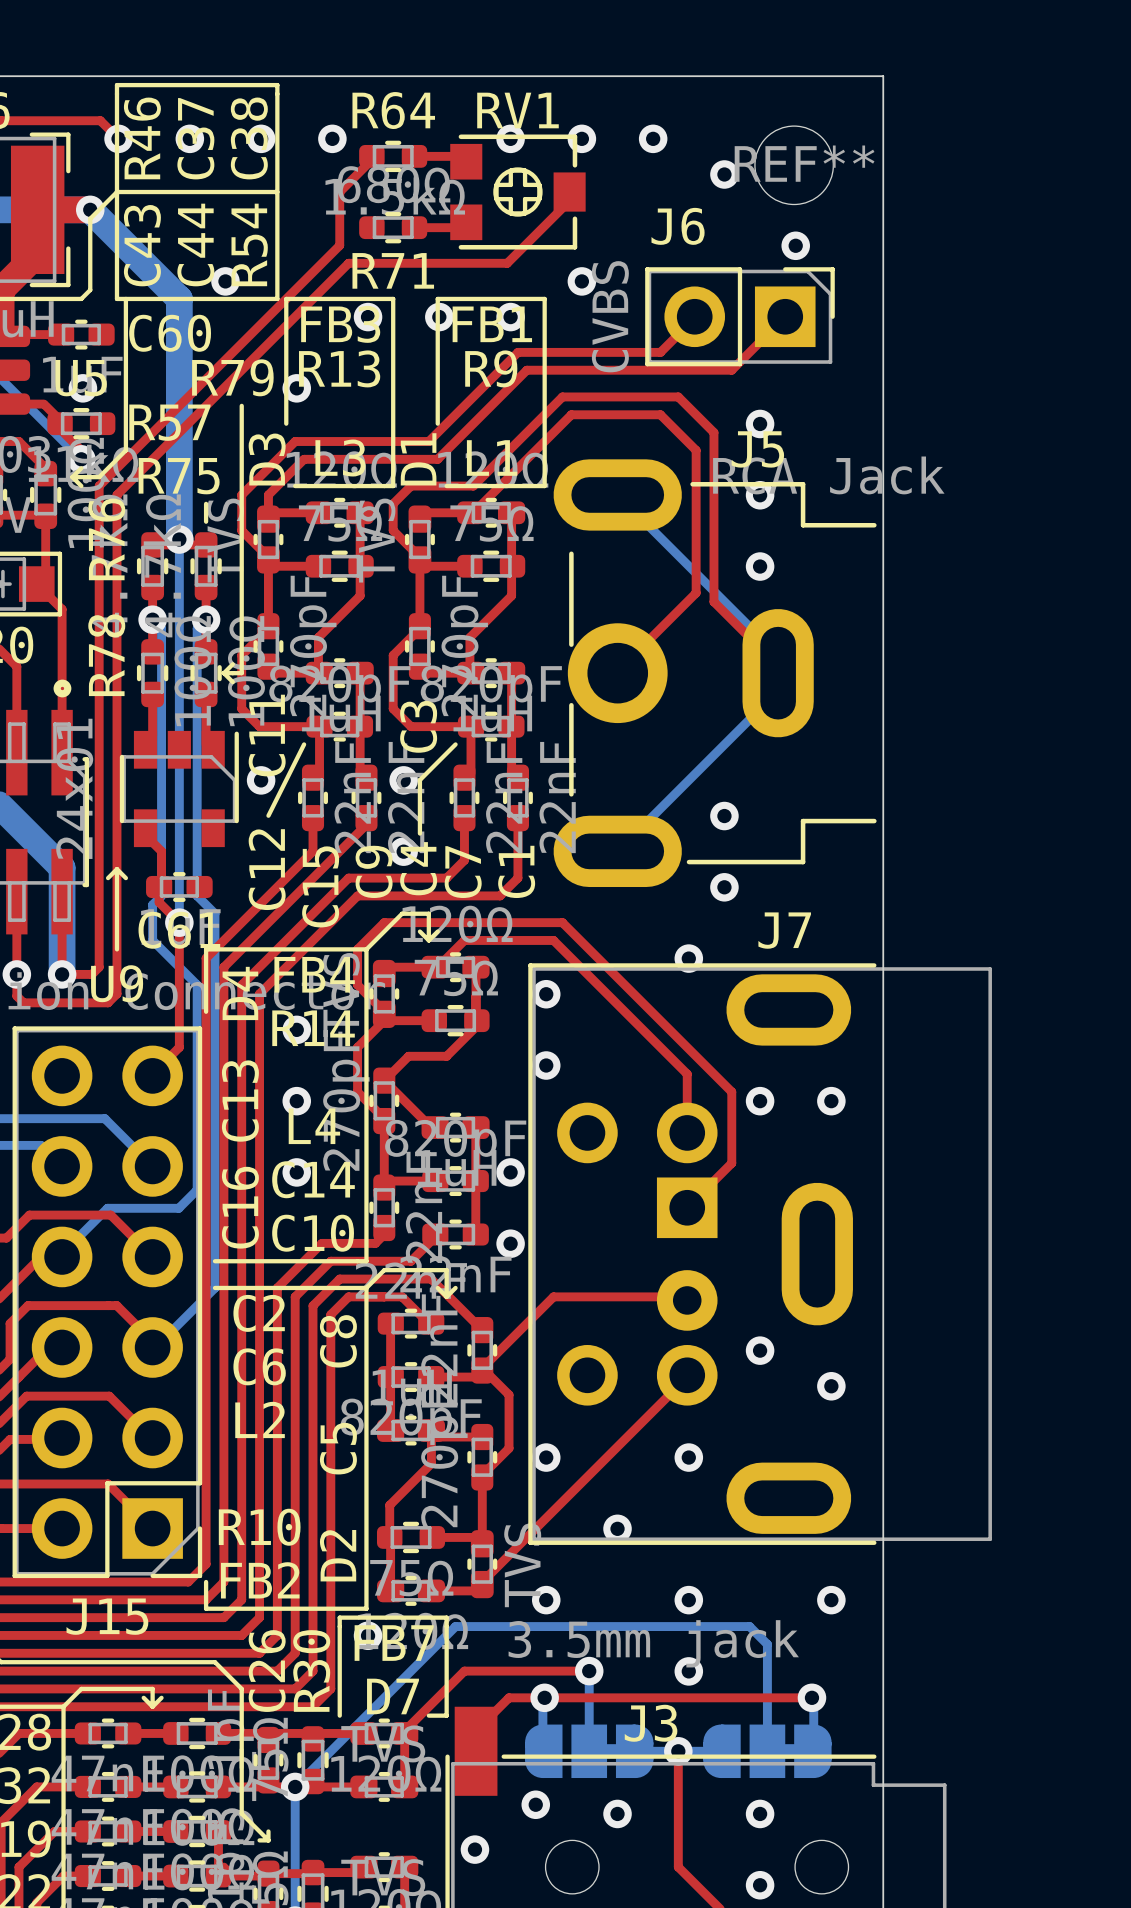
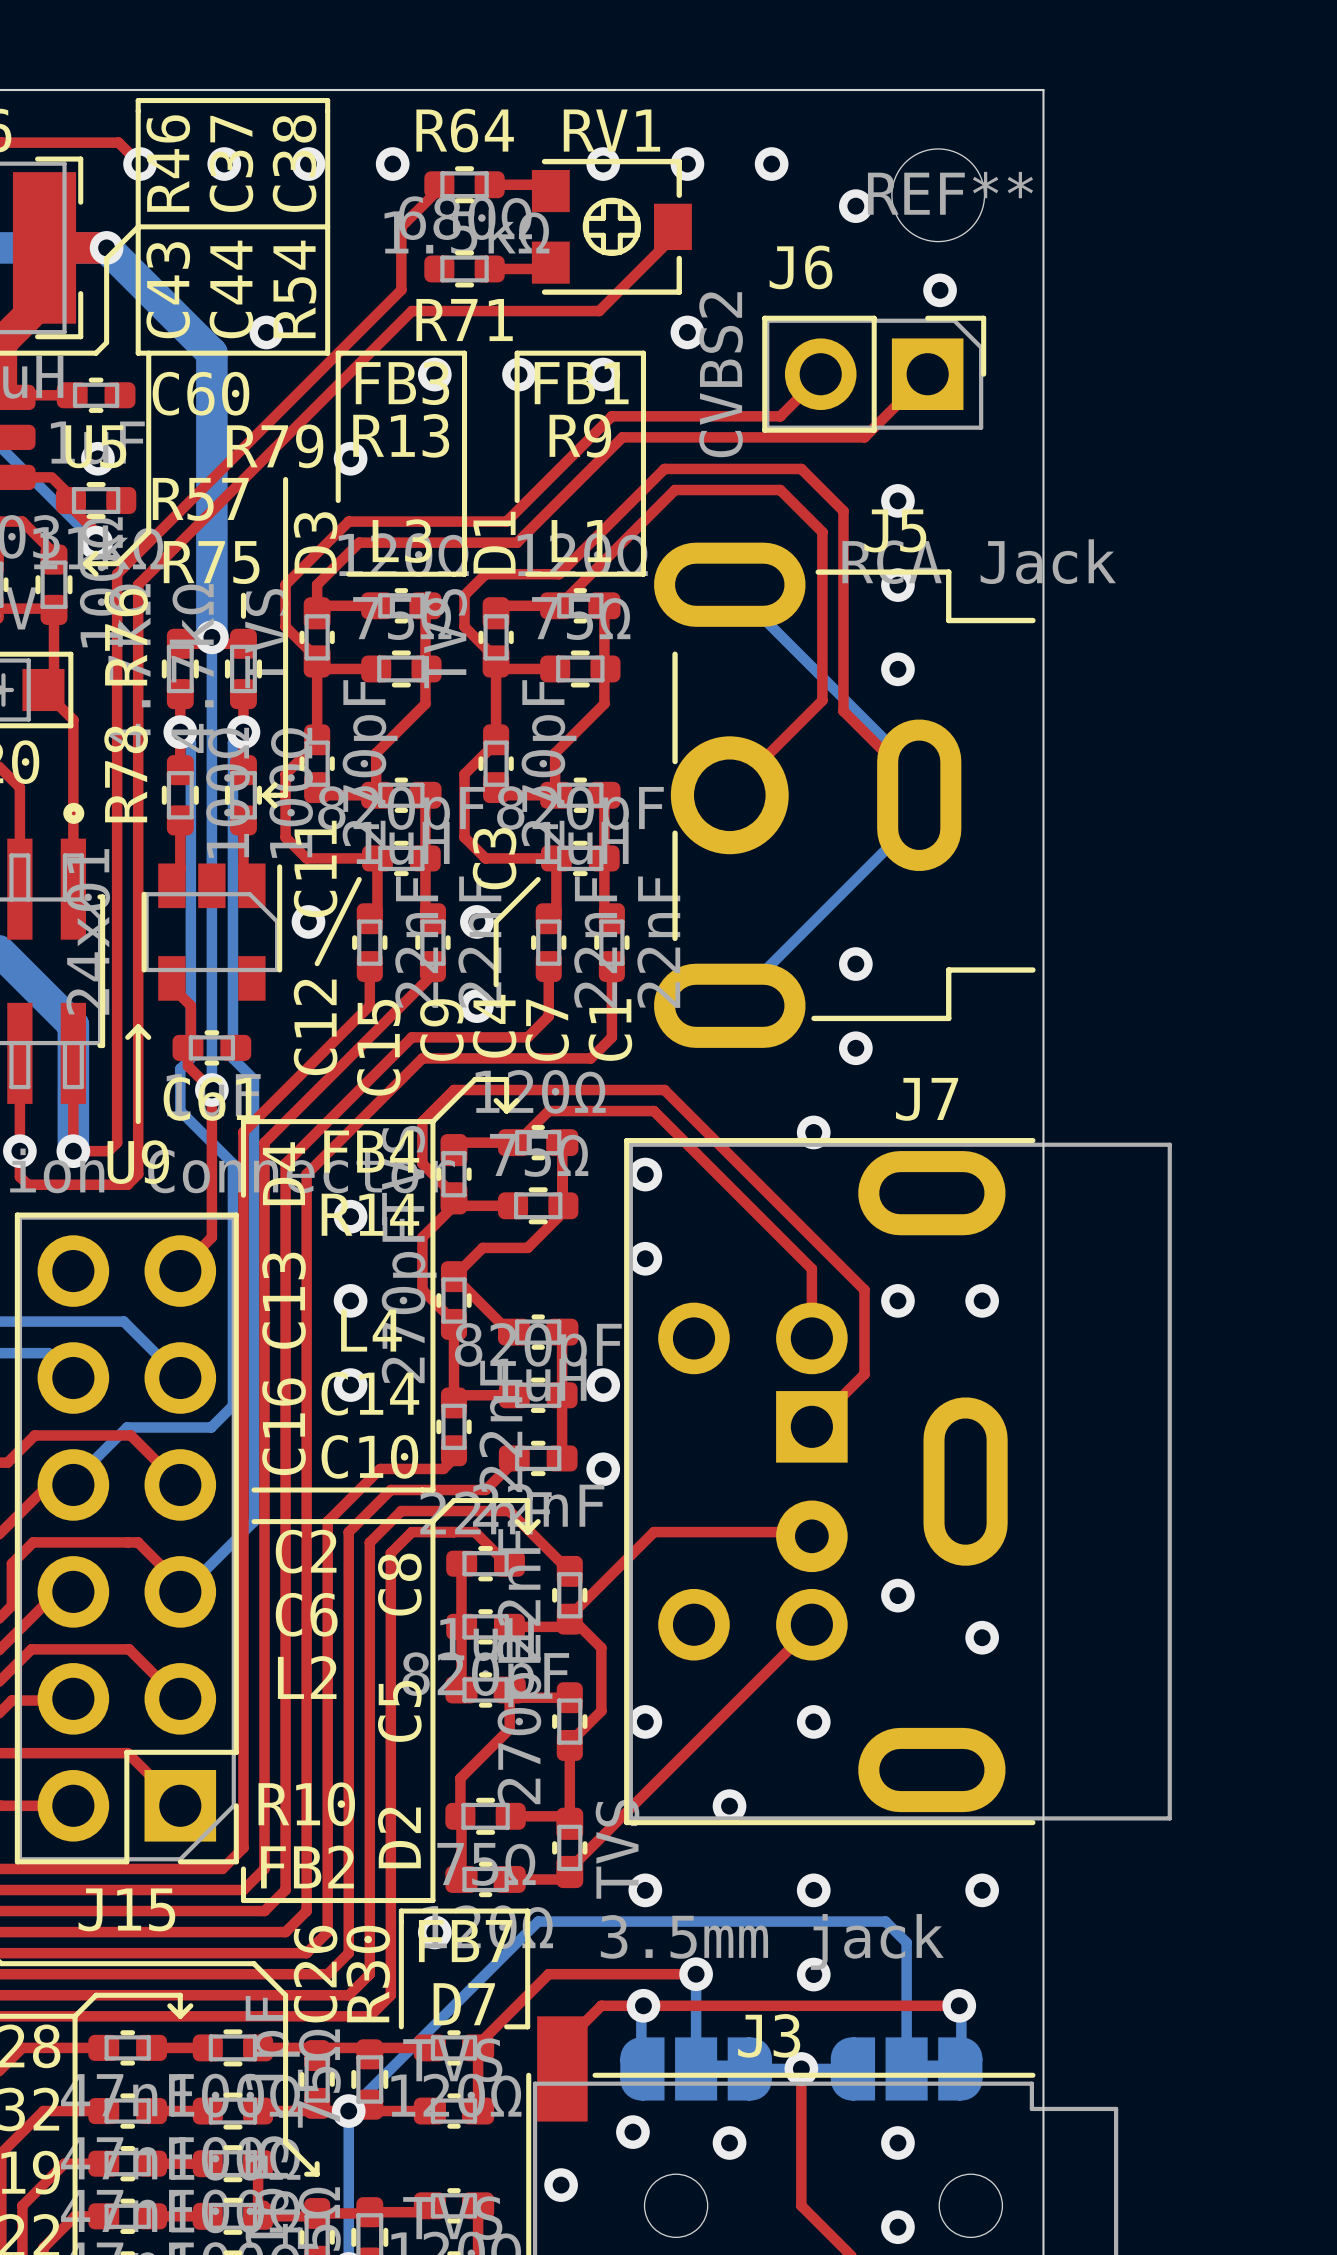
J6 value: CVBS (610, 316) -> CVBS2 (721, 374)

